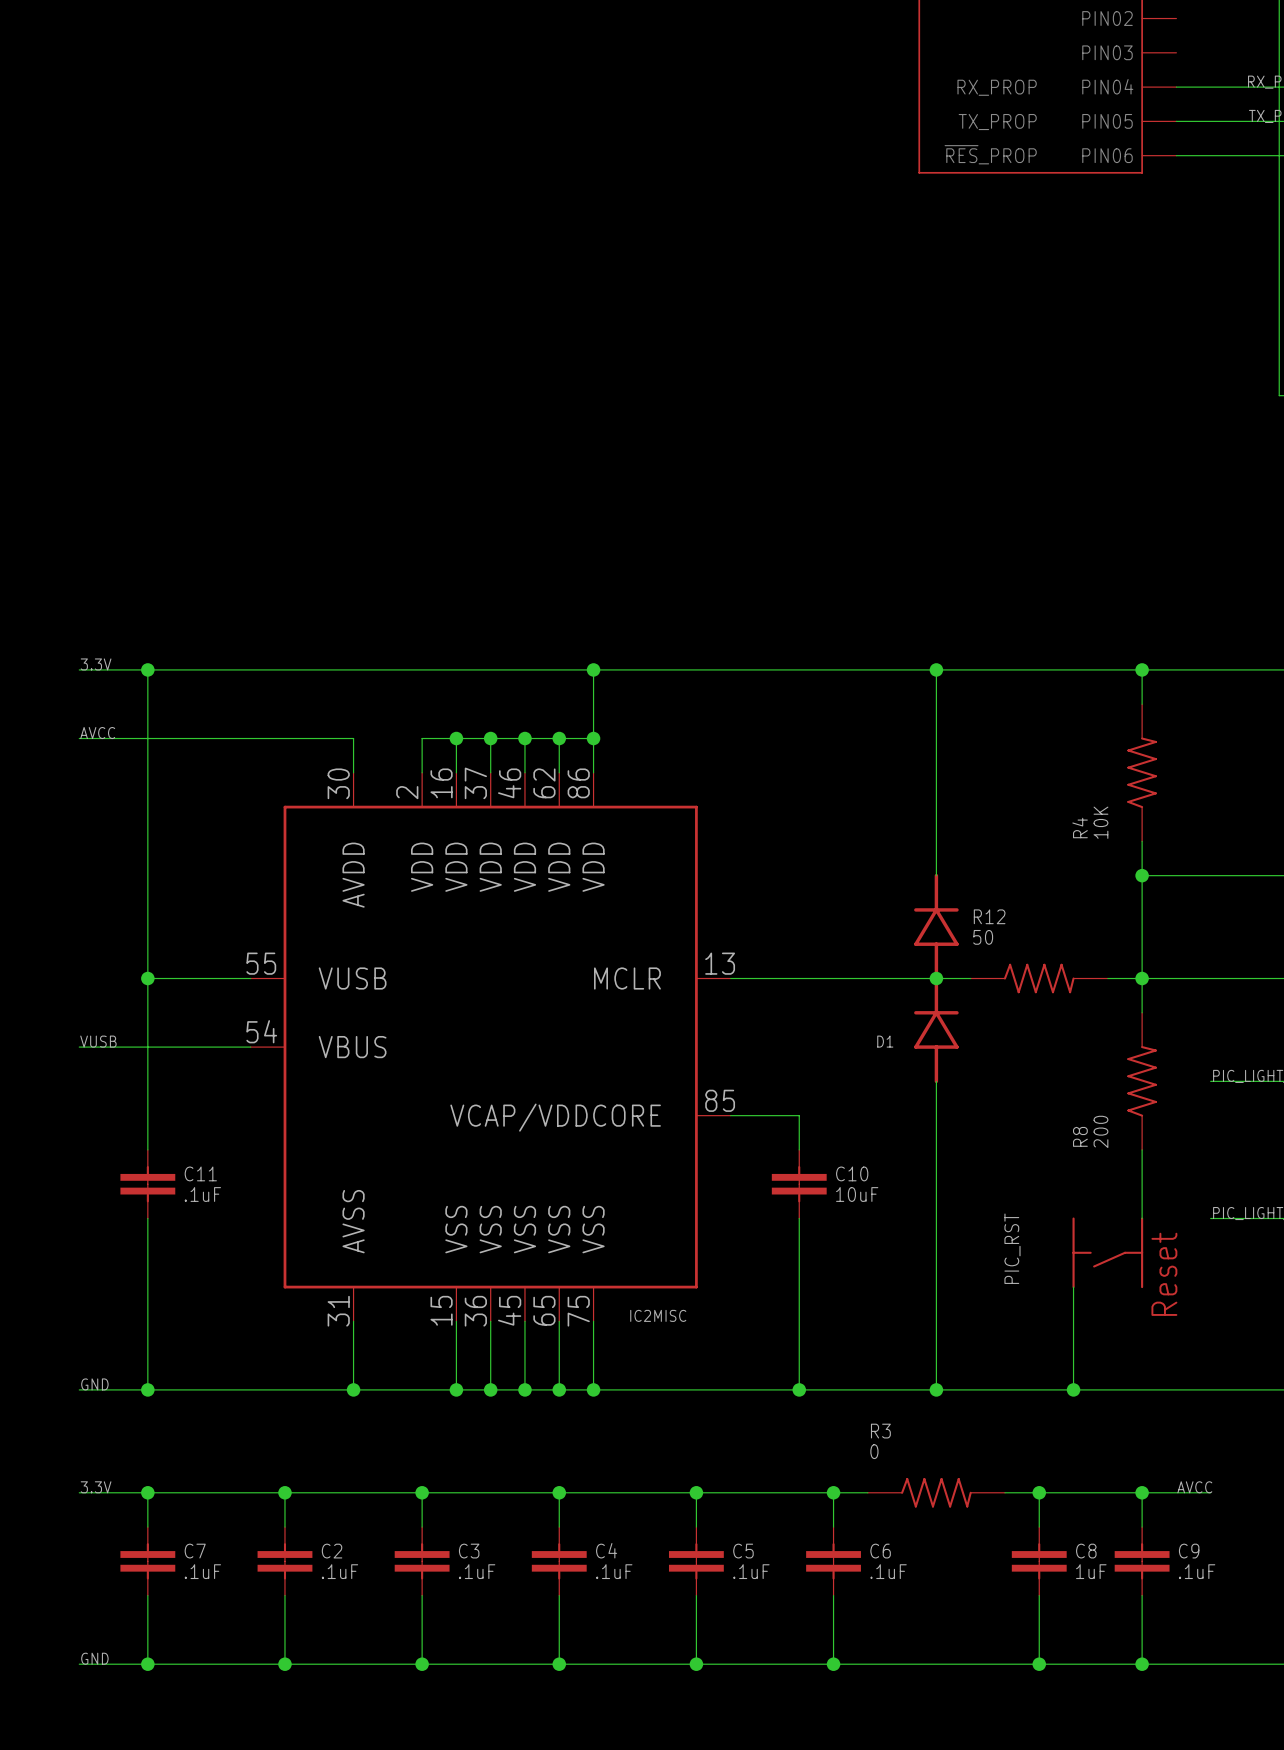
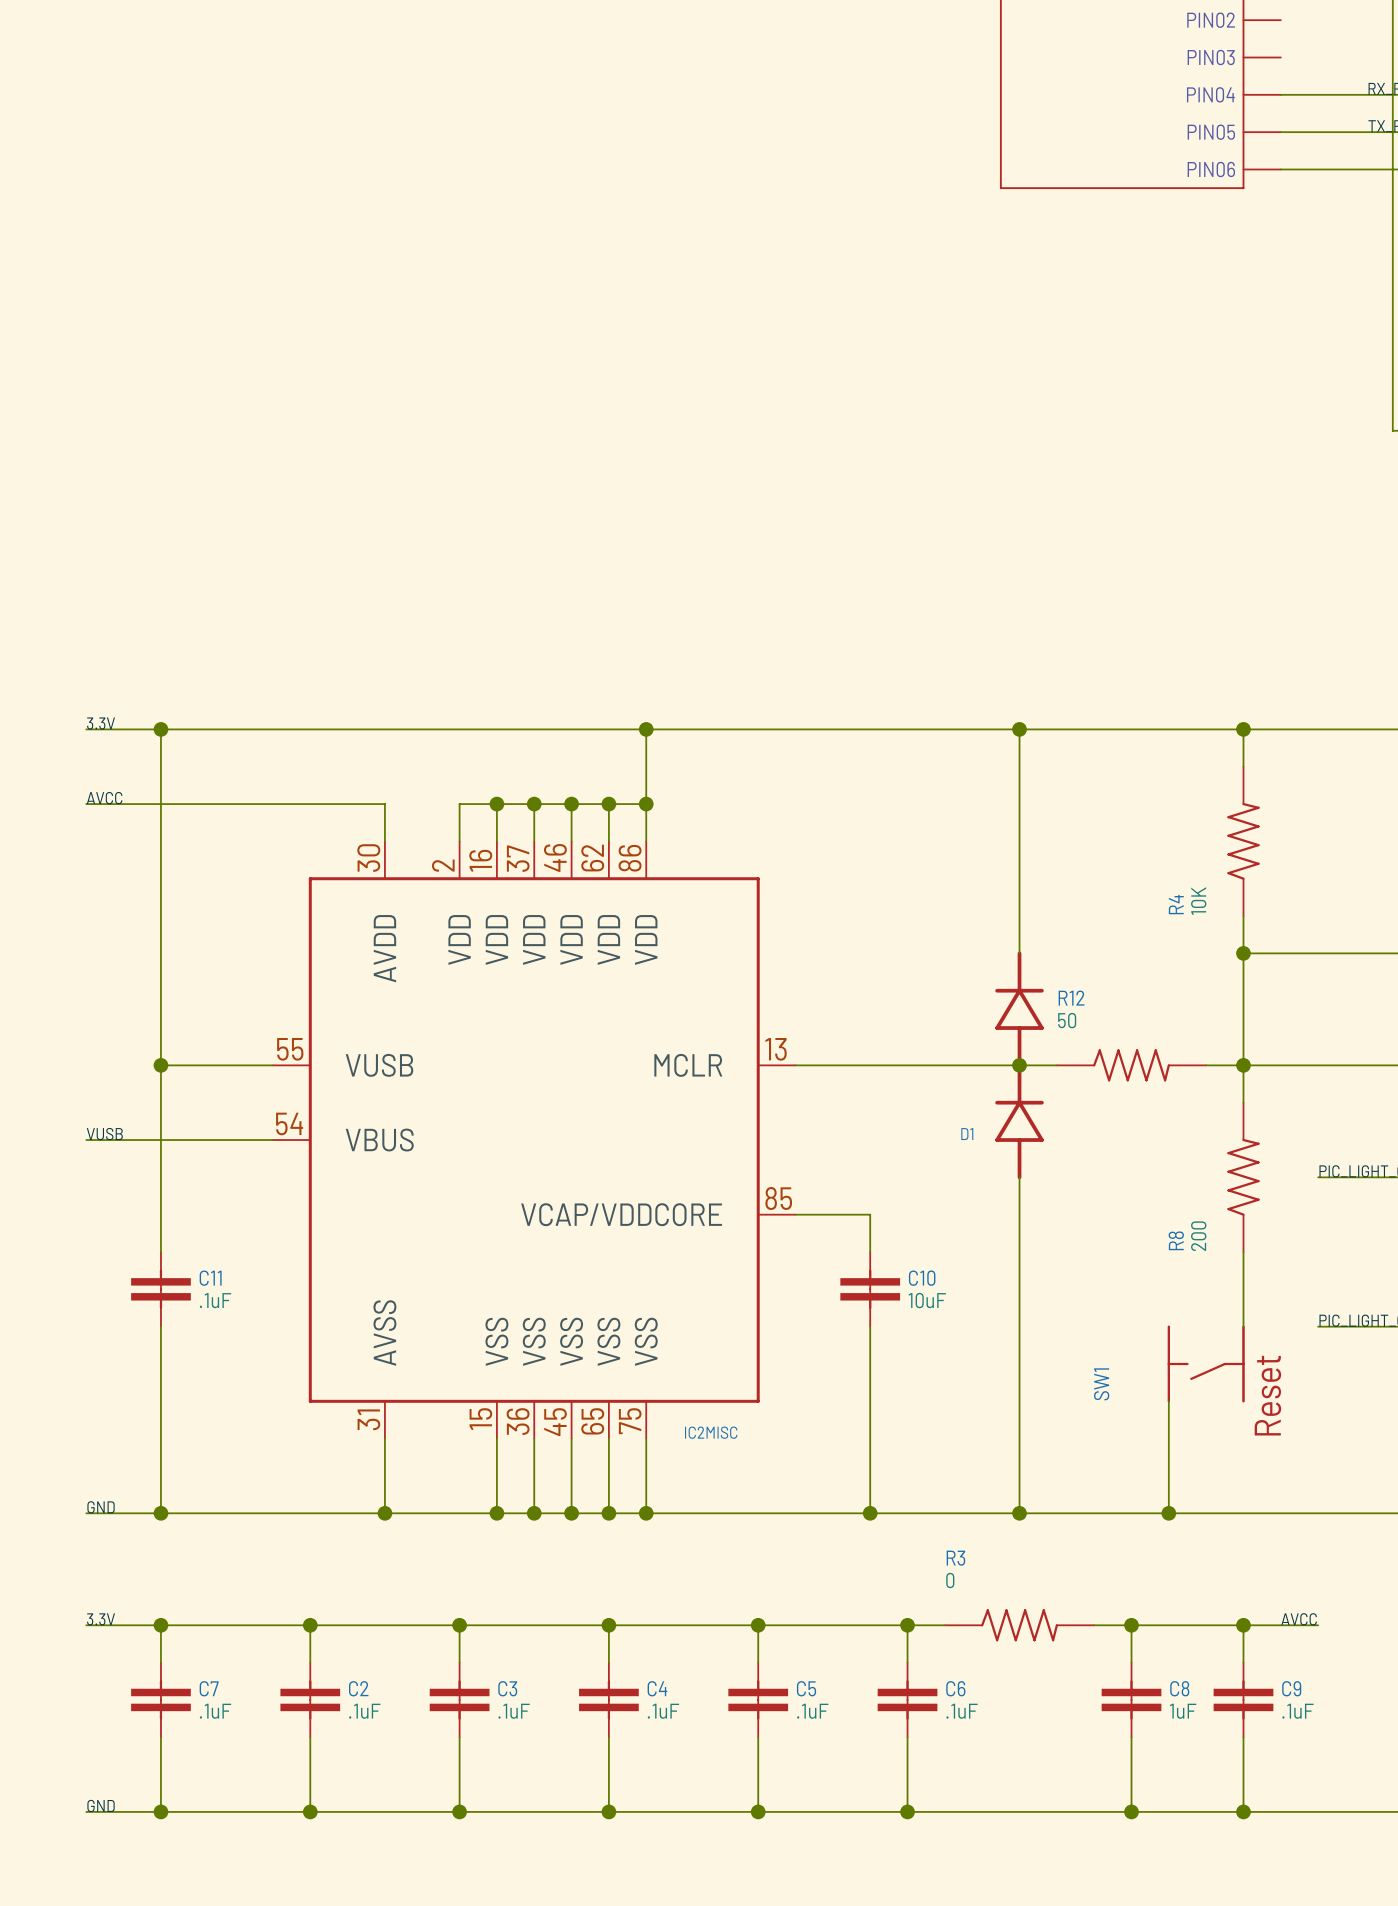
part text: RX_PROP (997, 87) -> none
part text: TX_PROP (997, 122) -> none
part text: ~{RES}_PROP (990, 154) -> none
PIC_RST name: PIC_RST (1012, 1248) -> SW1 (1101, 1384)

